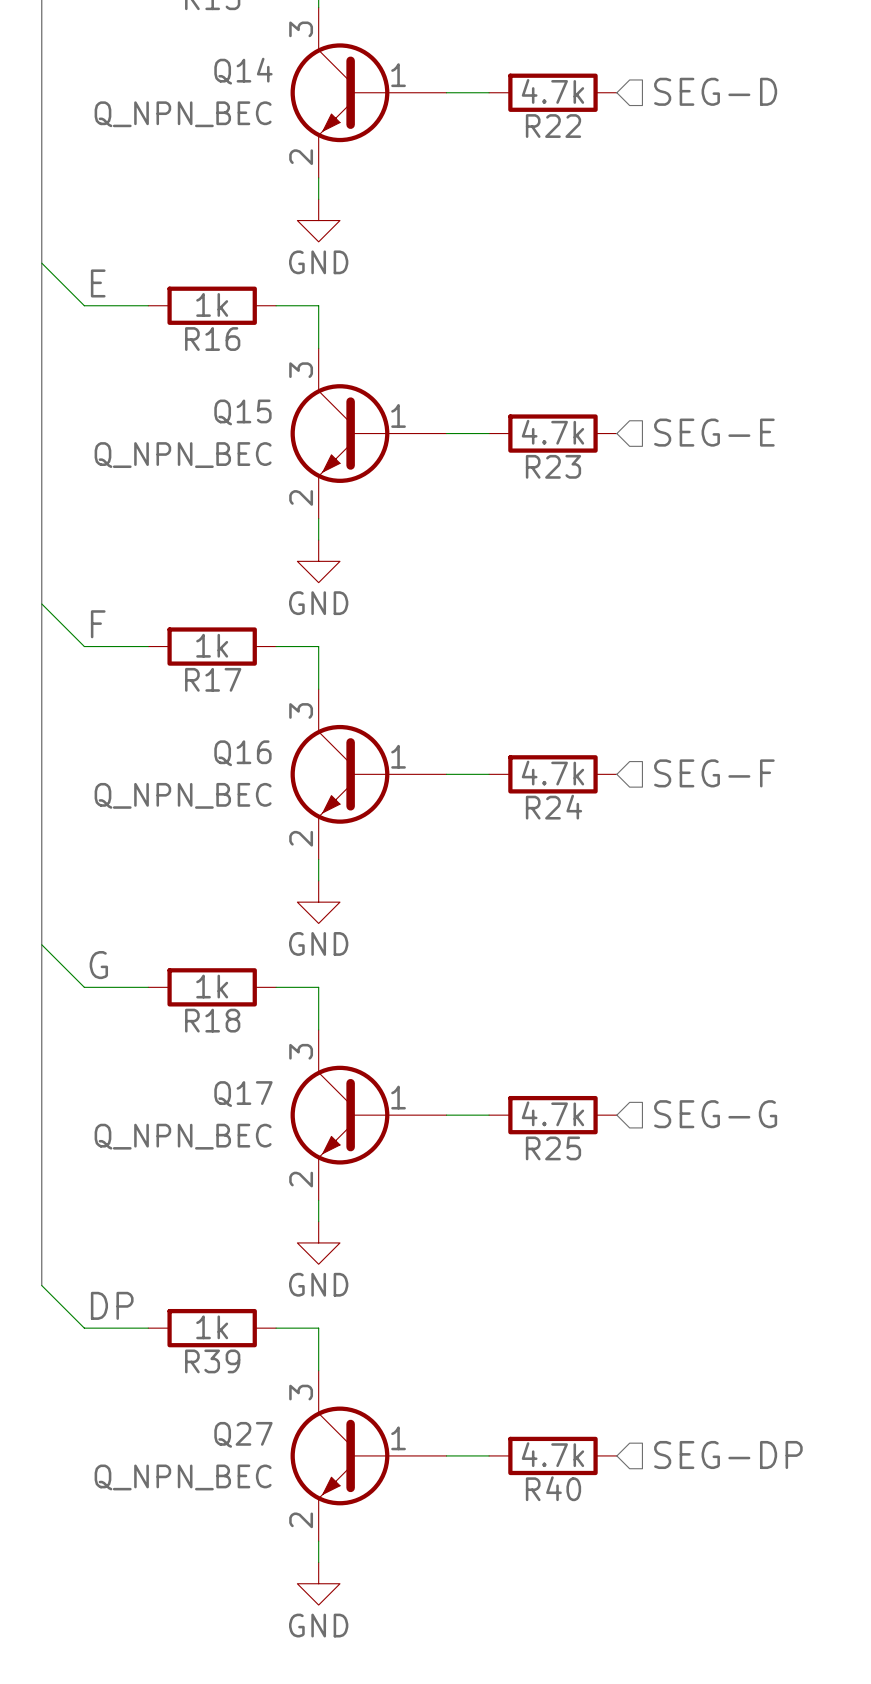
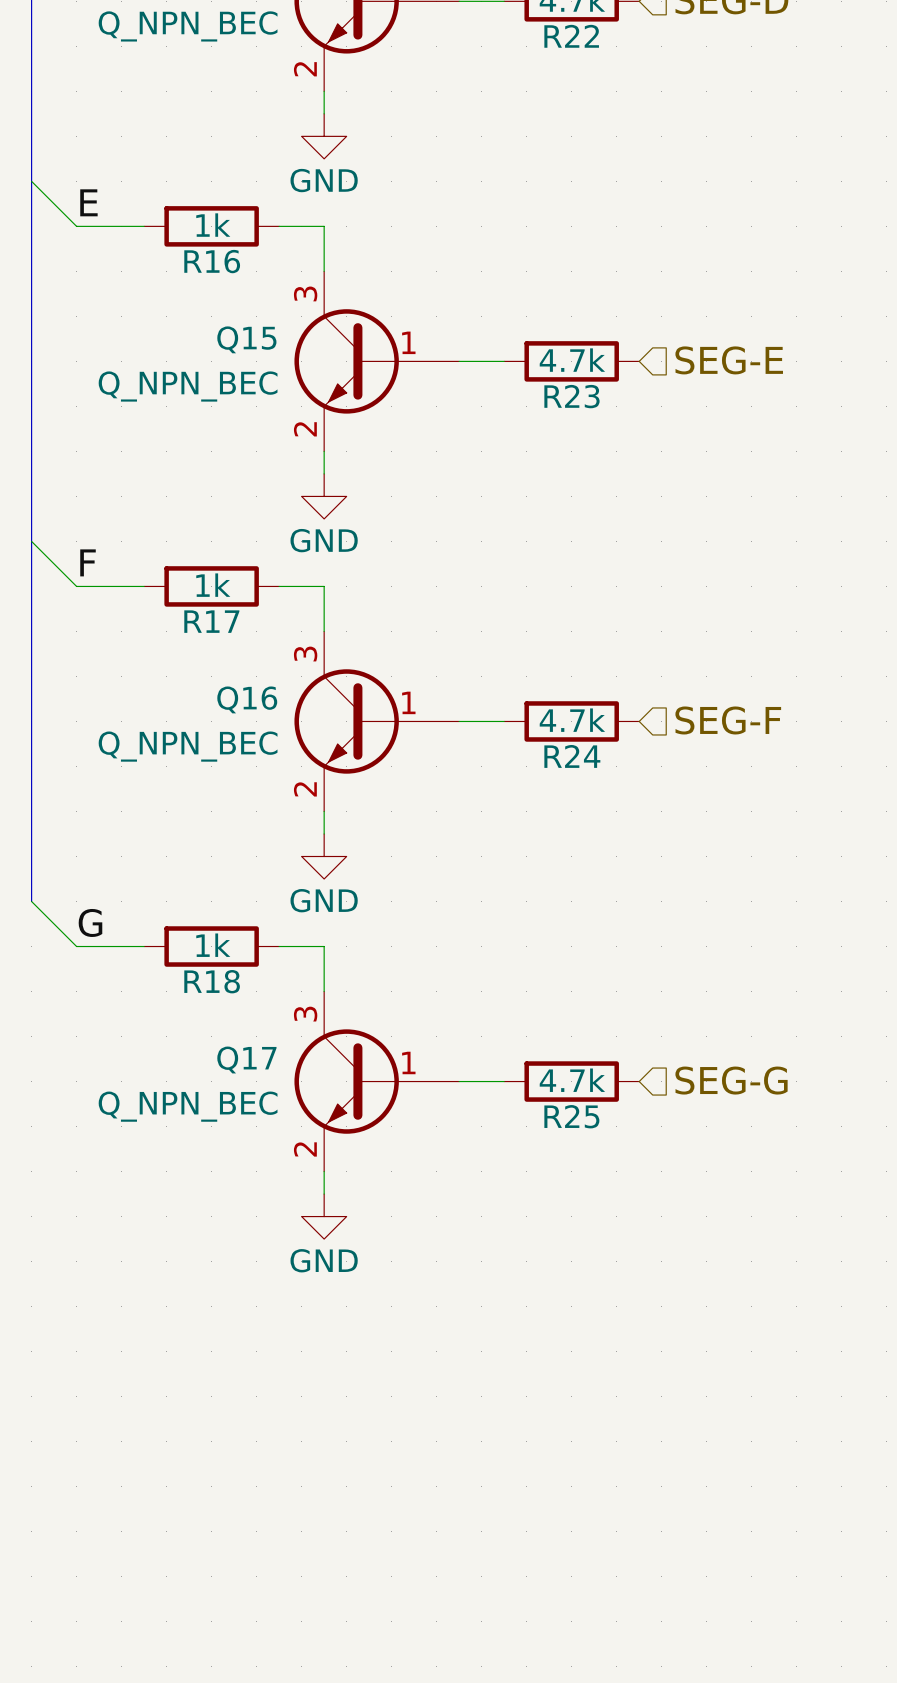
bus: (41, 944) (41, 1285) -> none
wire: (41, 1285) (84, 1328) (148, 1328) -> none
label: DP (112, 1305) -> none
R39: 1k (212, 1328) -> none
wire: (276, 1328) (318, 1328) (318, 1370) -> none
hierarchical label: SEG-DP (728, 1454) -> none
Q27: Q_NPN_BEC (368, 1455) -> none
wire: (446, 1455) (489, 1455) -> none
R40: 4.7k (552, 1455) -> none
wire: (318, 1541) (318, 1562) -> none
power symbol: GND (318, 1583) -> none

